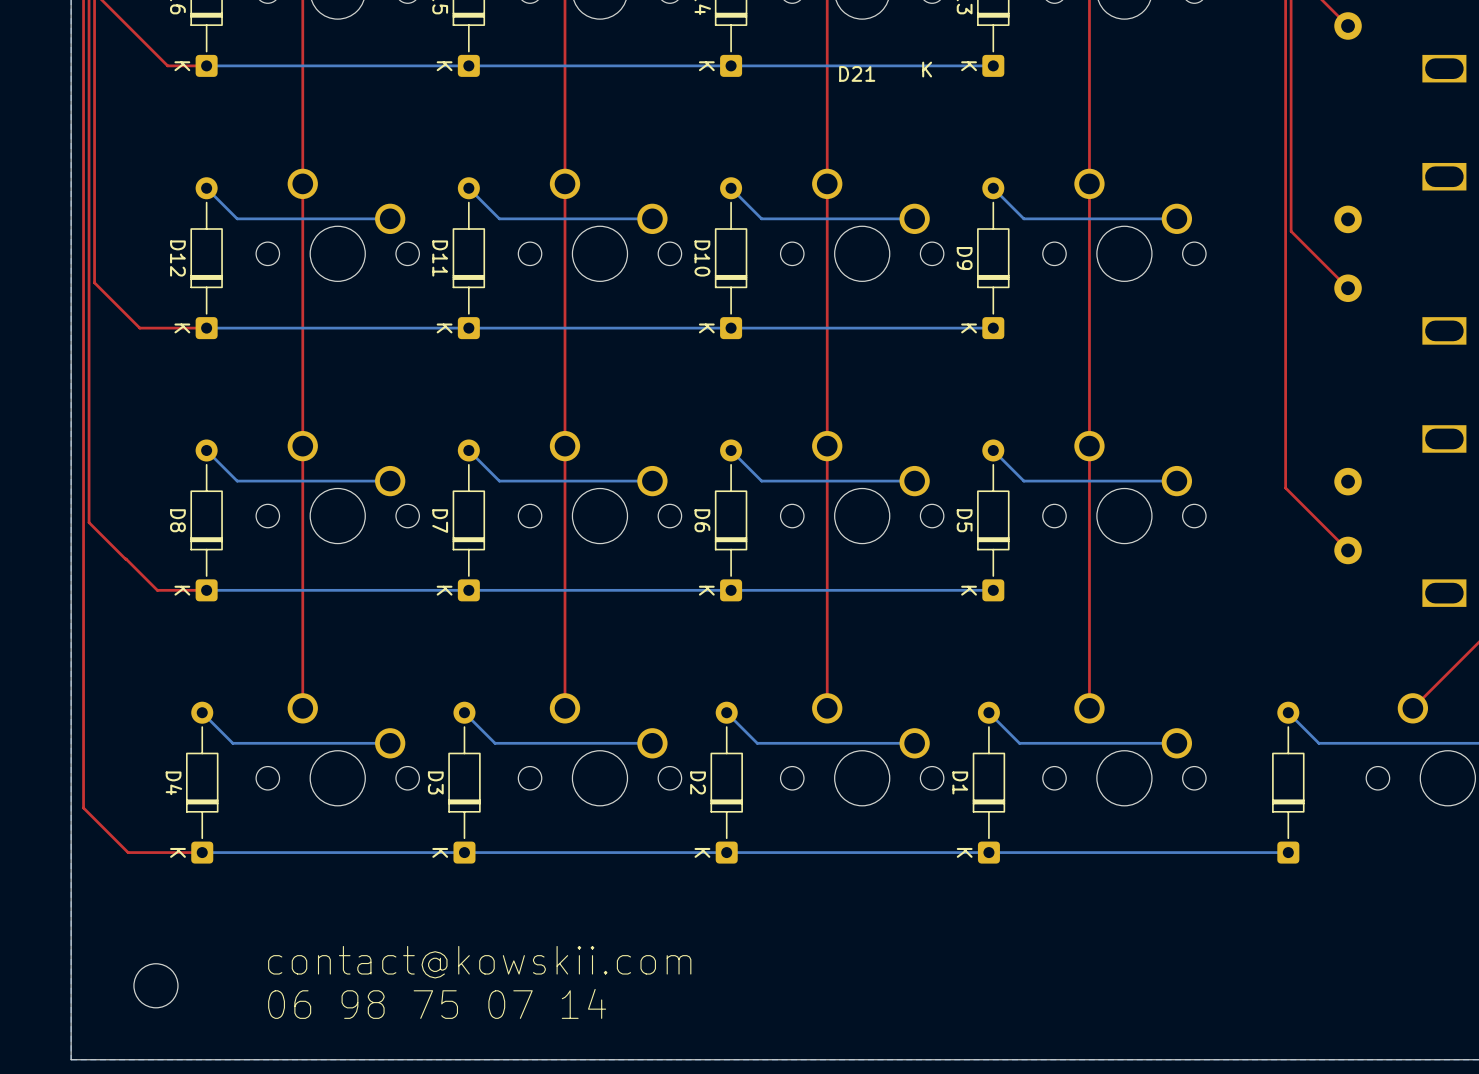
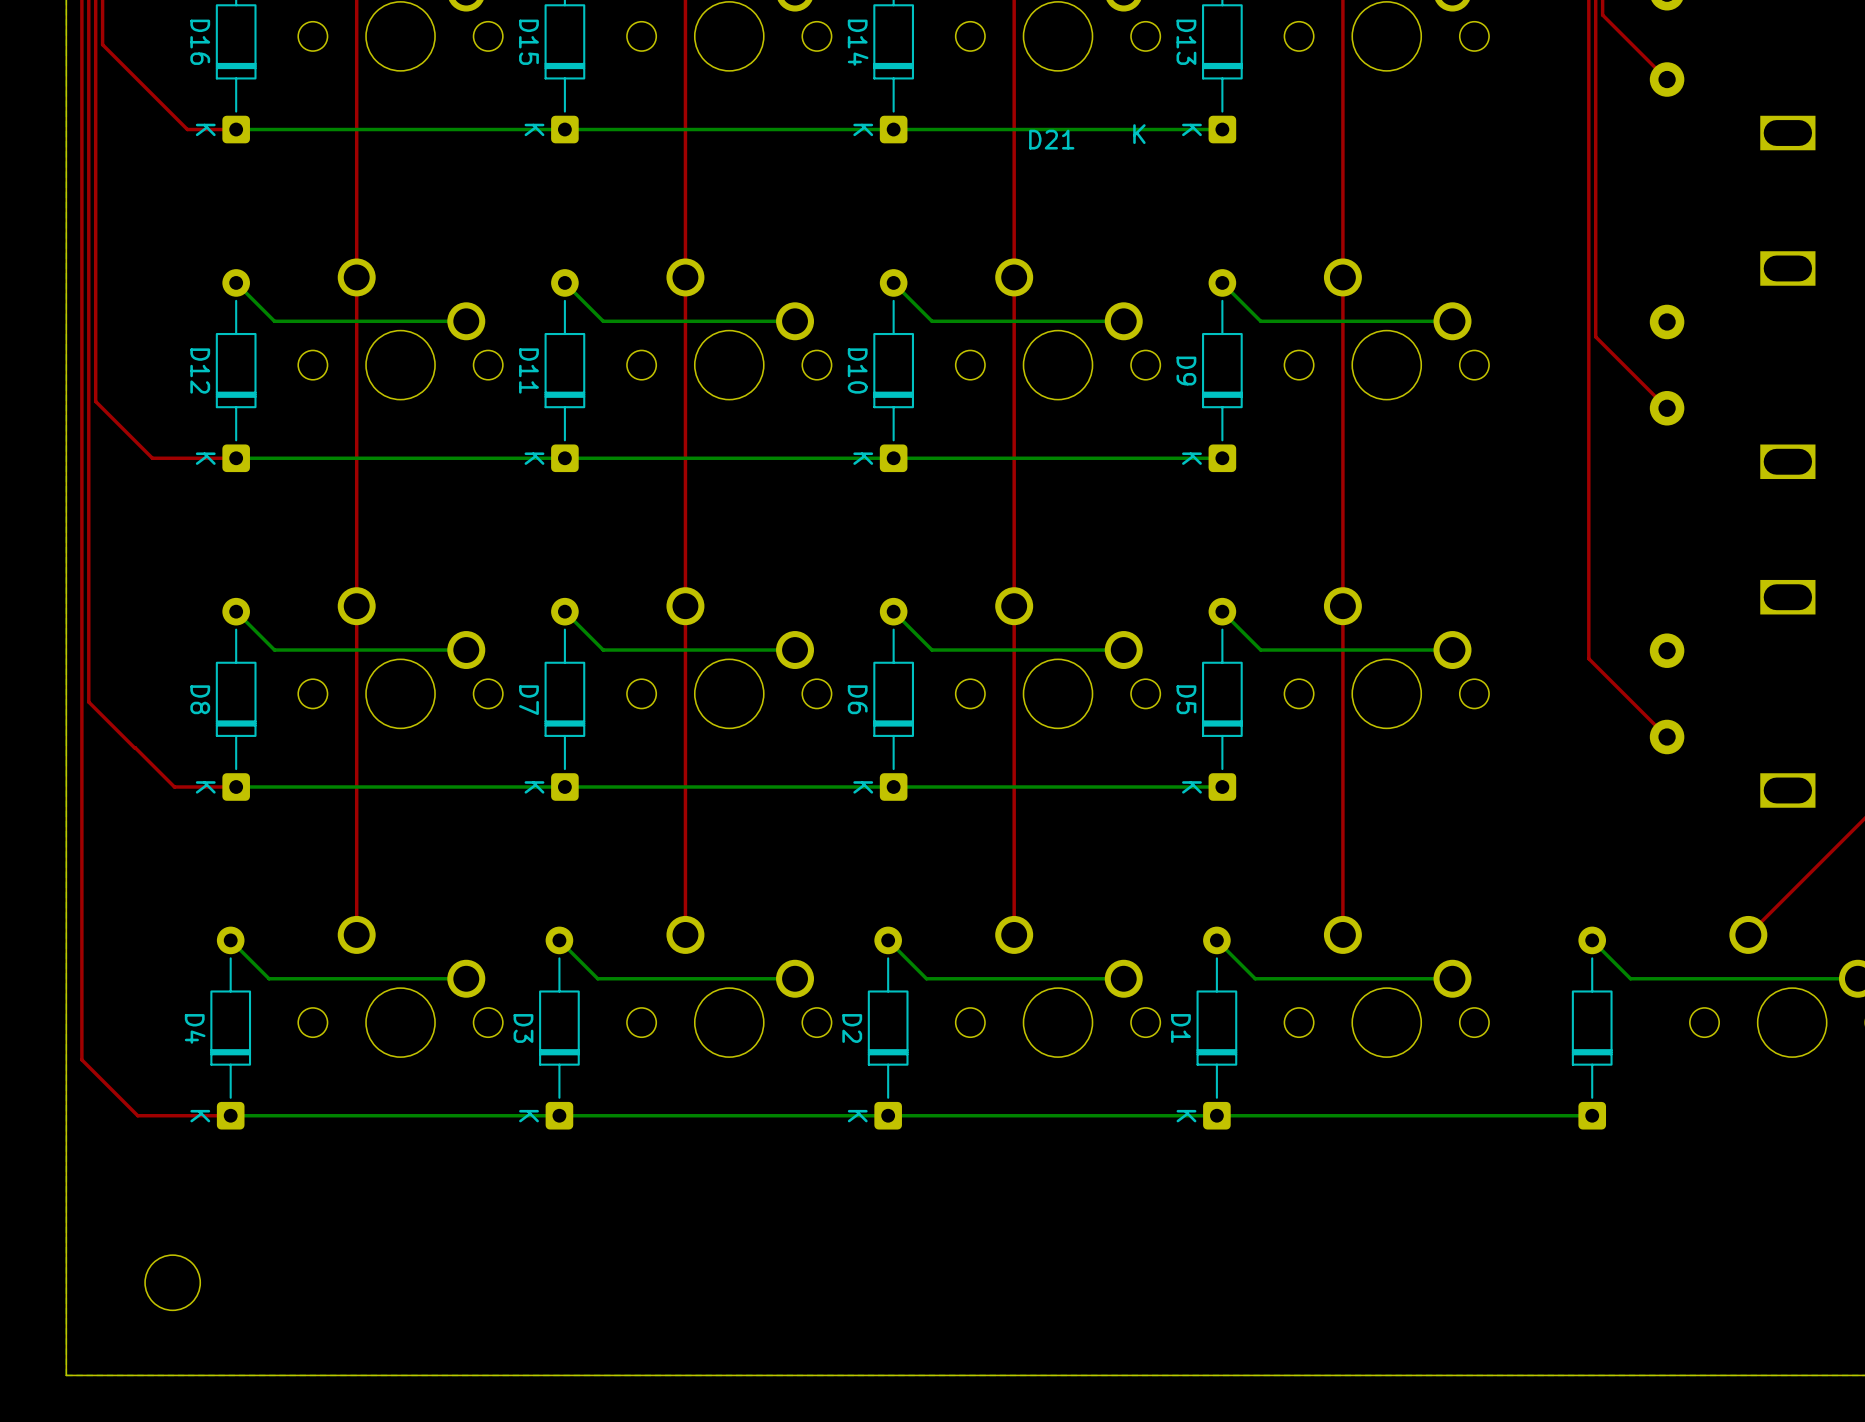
text: contact@kowskii.com (479, 962) -> none
text: 06 98 75 07 14 (437, 1003) -> none

